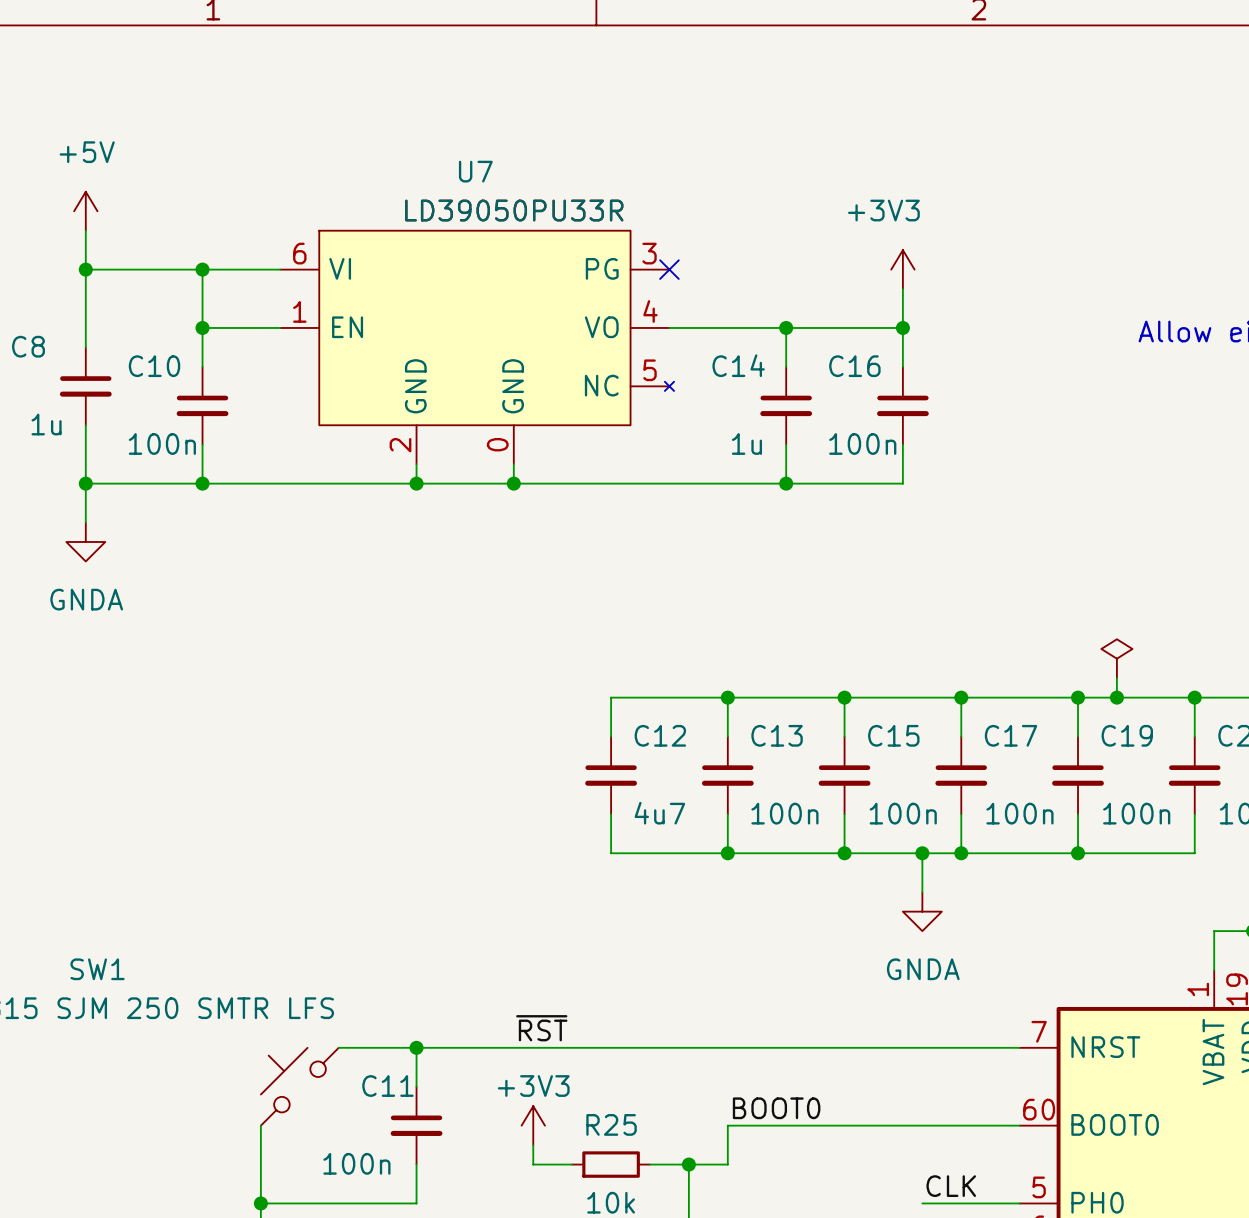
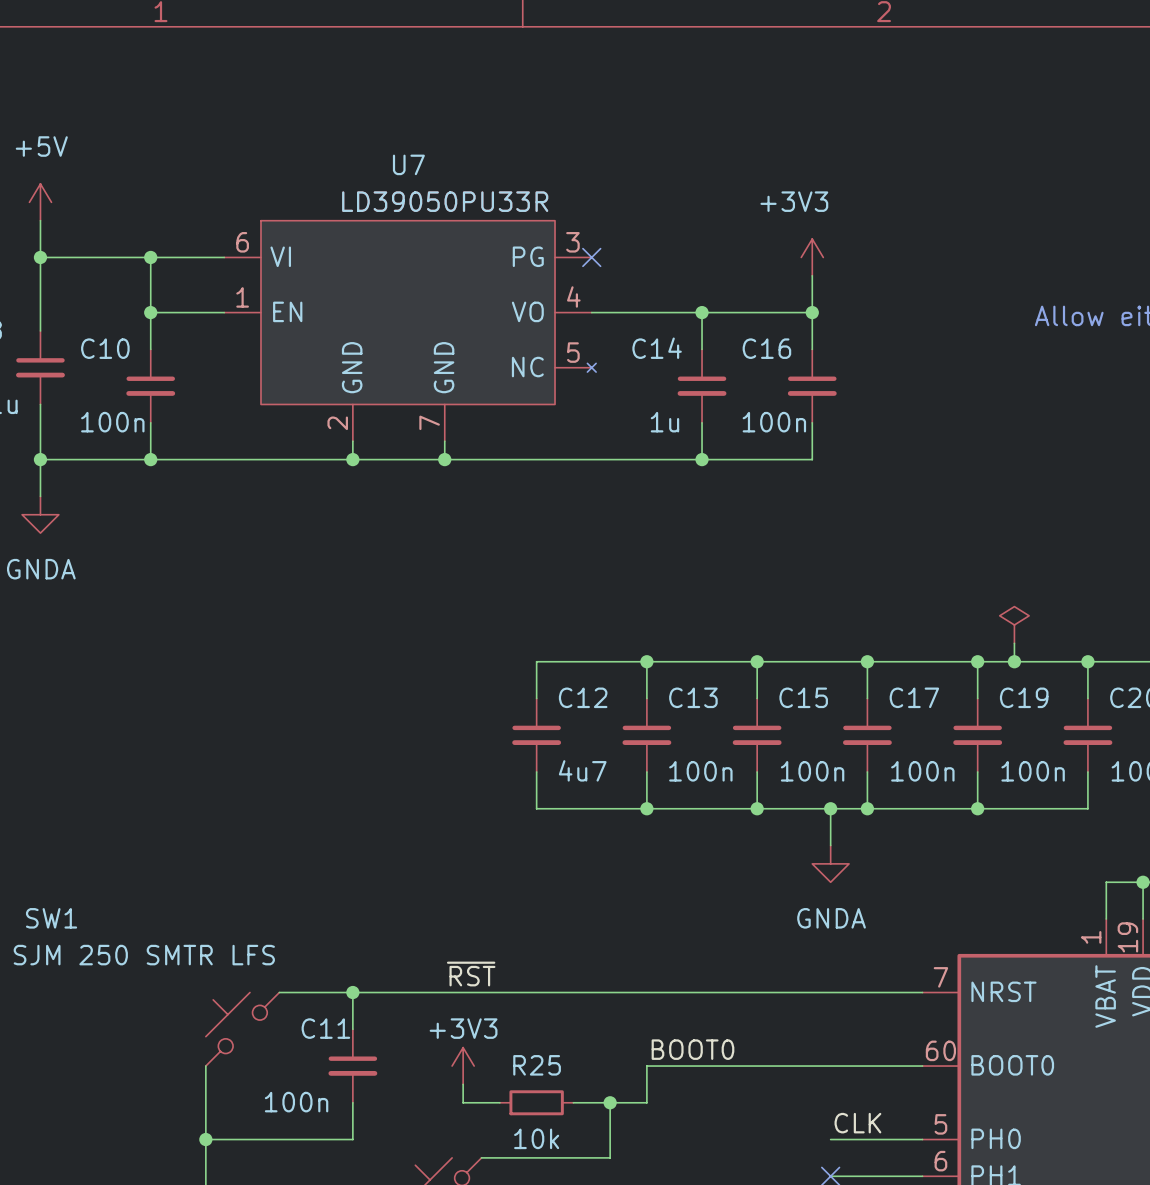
U7 pin number: 0 (497, 444) -> 7 (429, 422)

